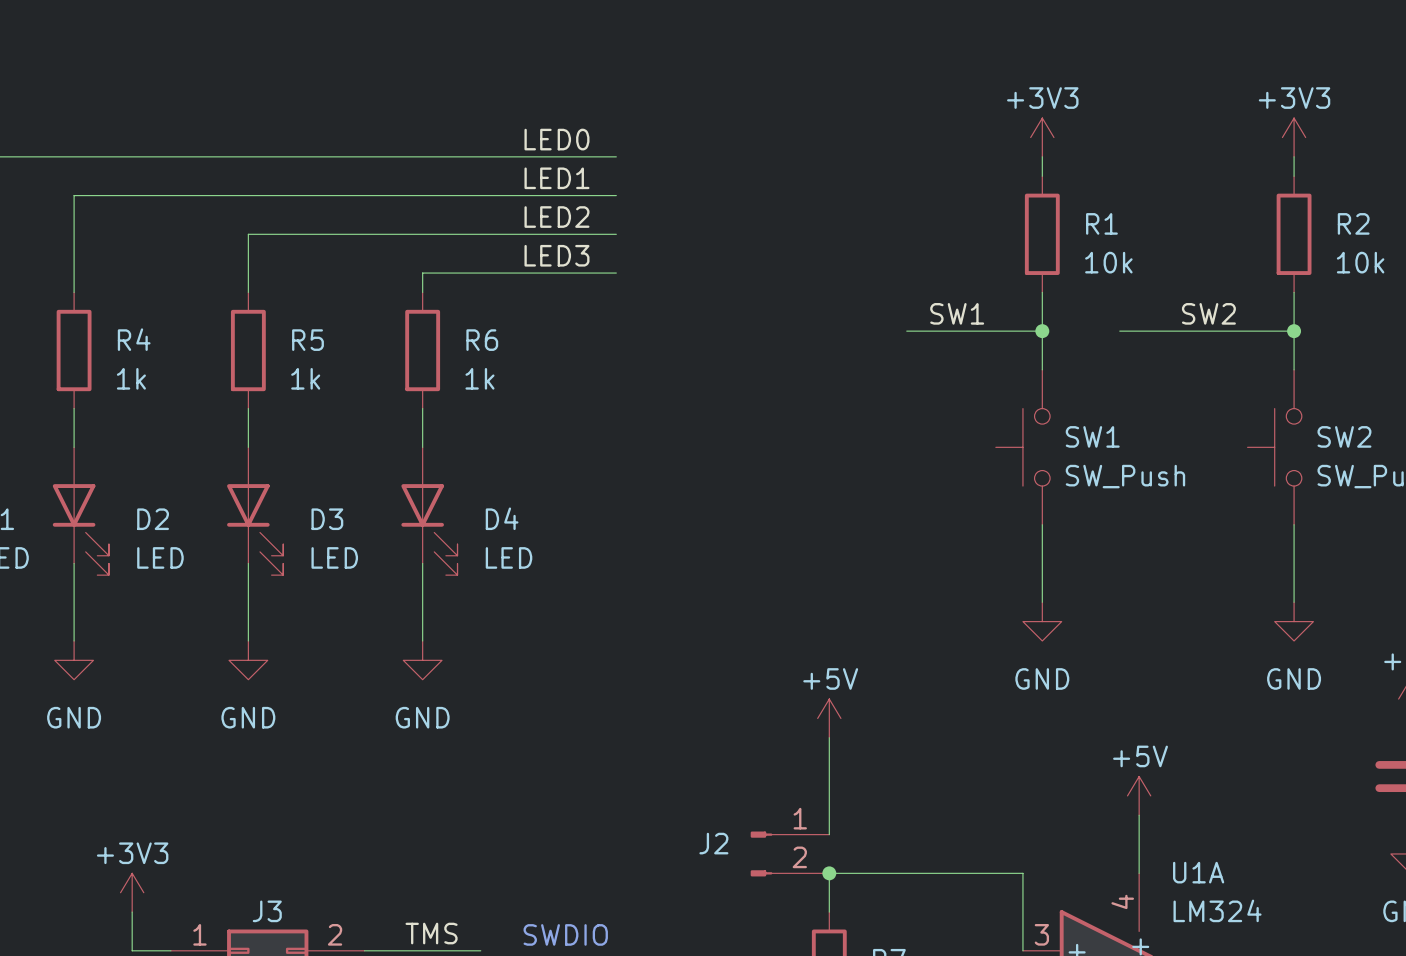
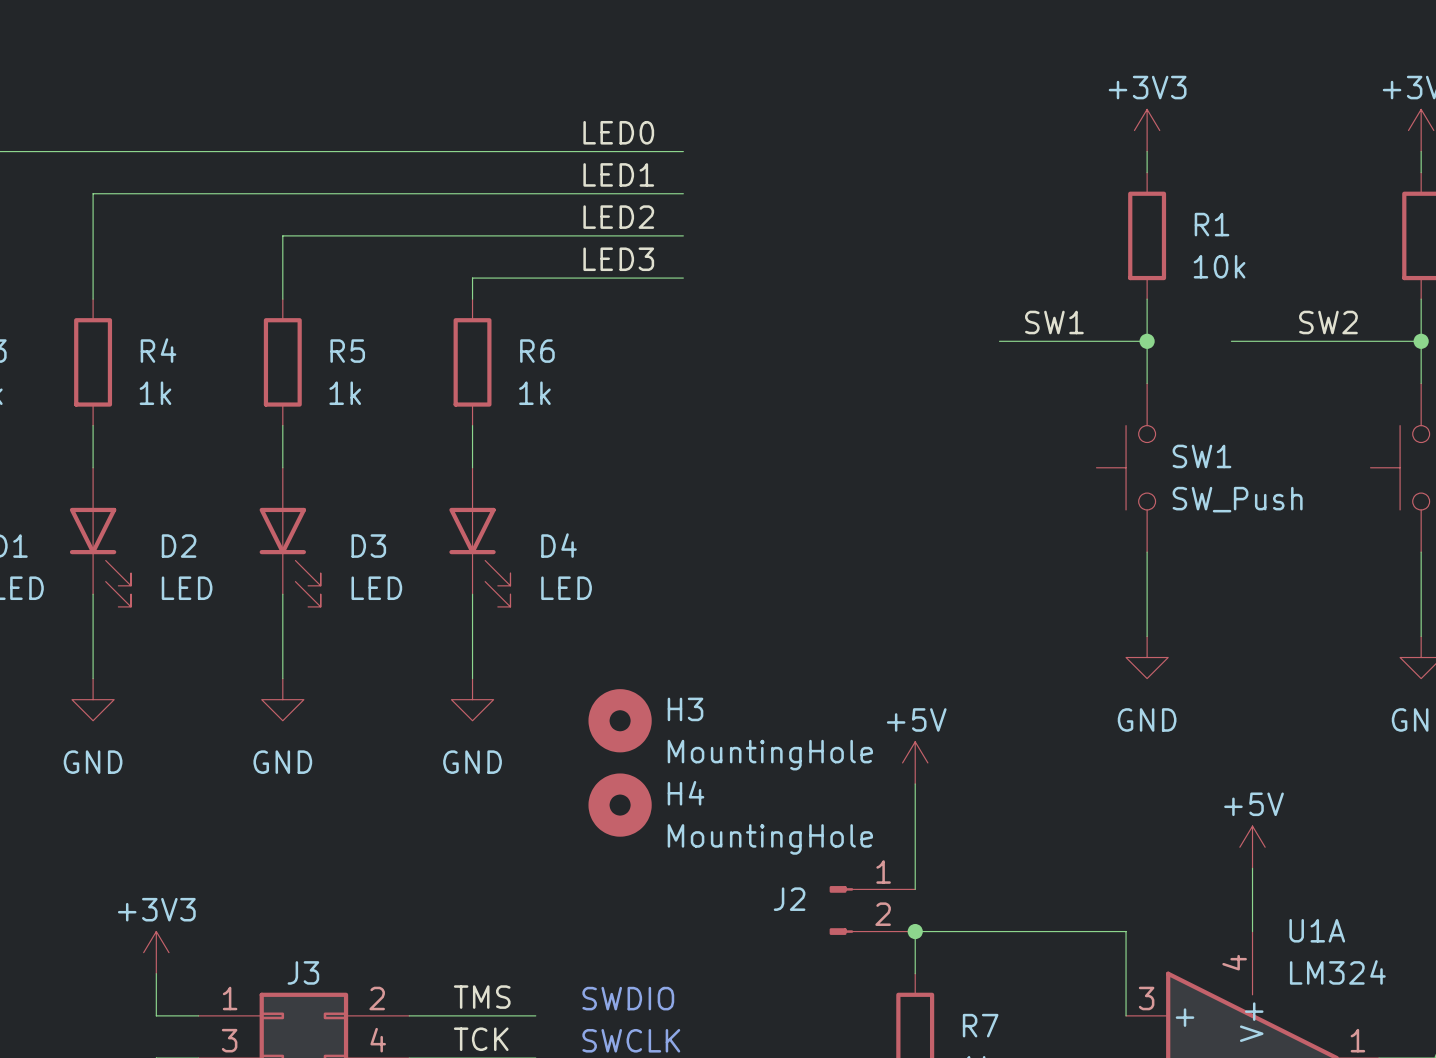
H3: none -> MountingHole (620, 720)
H4: none -> MountingHole (620, 805)

